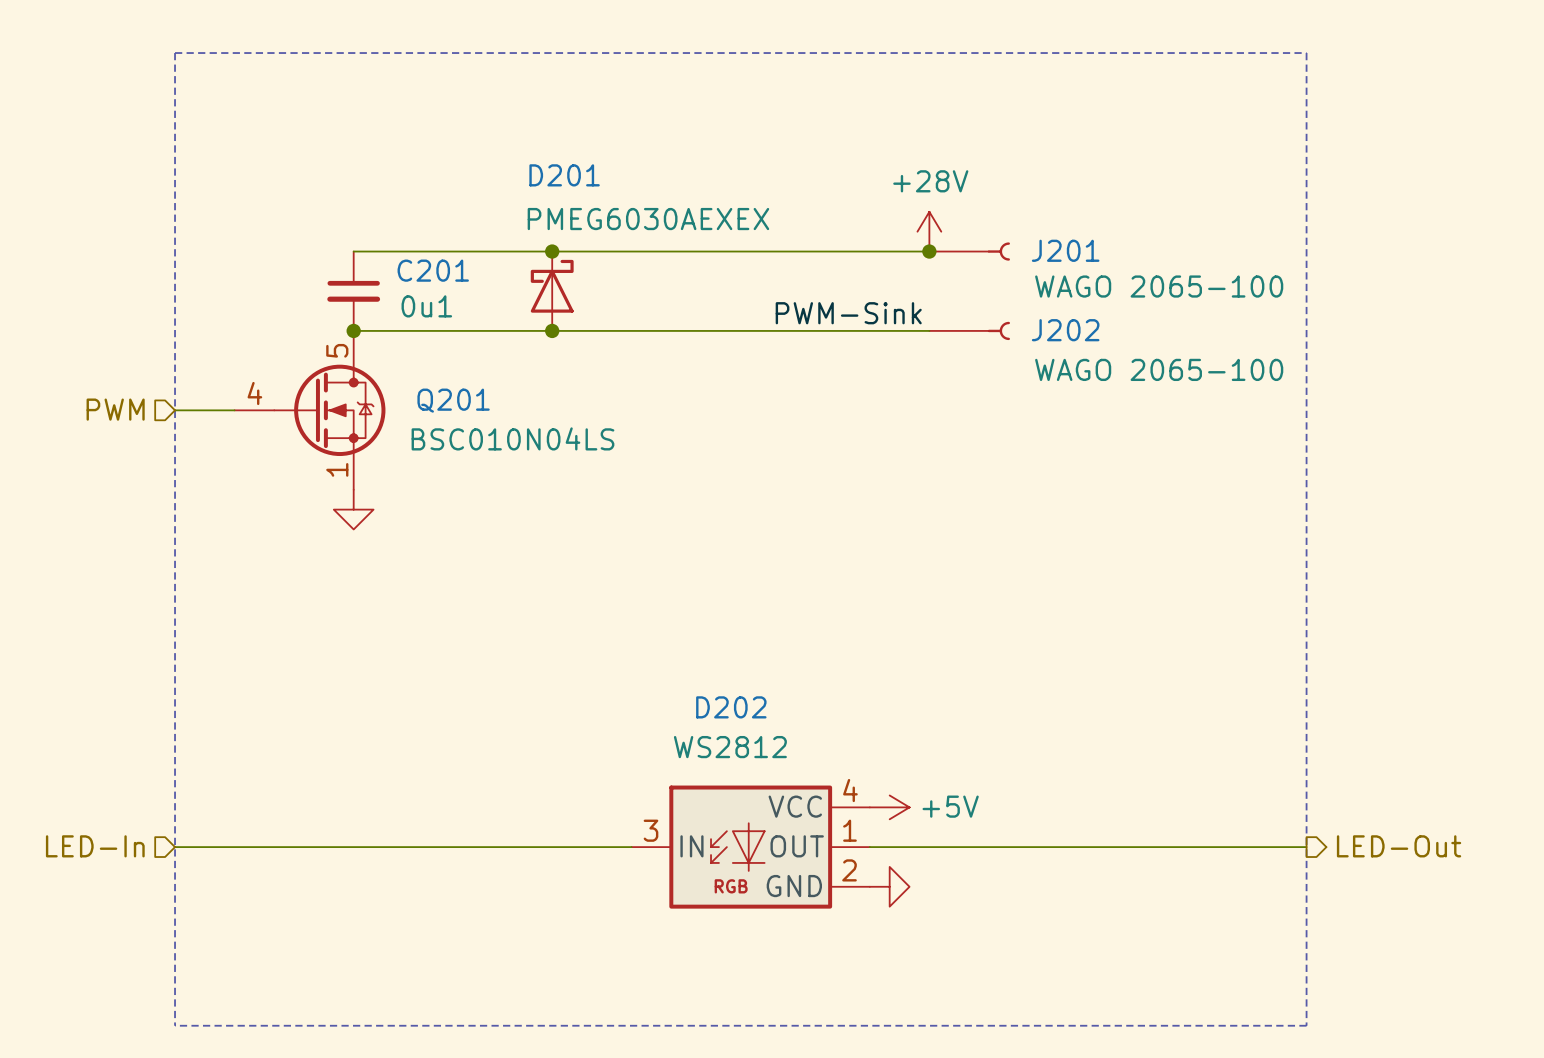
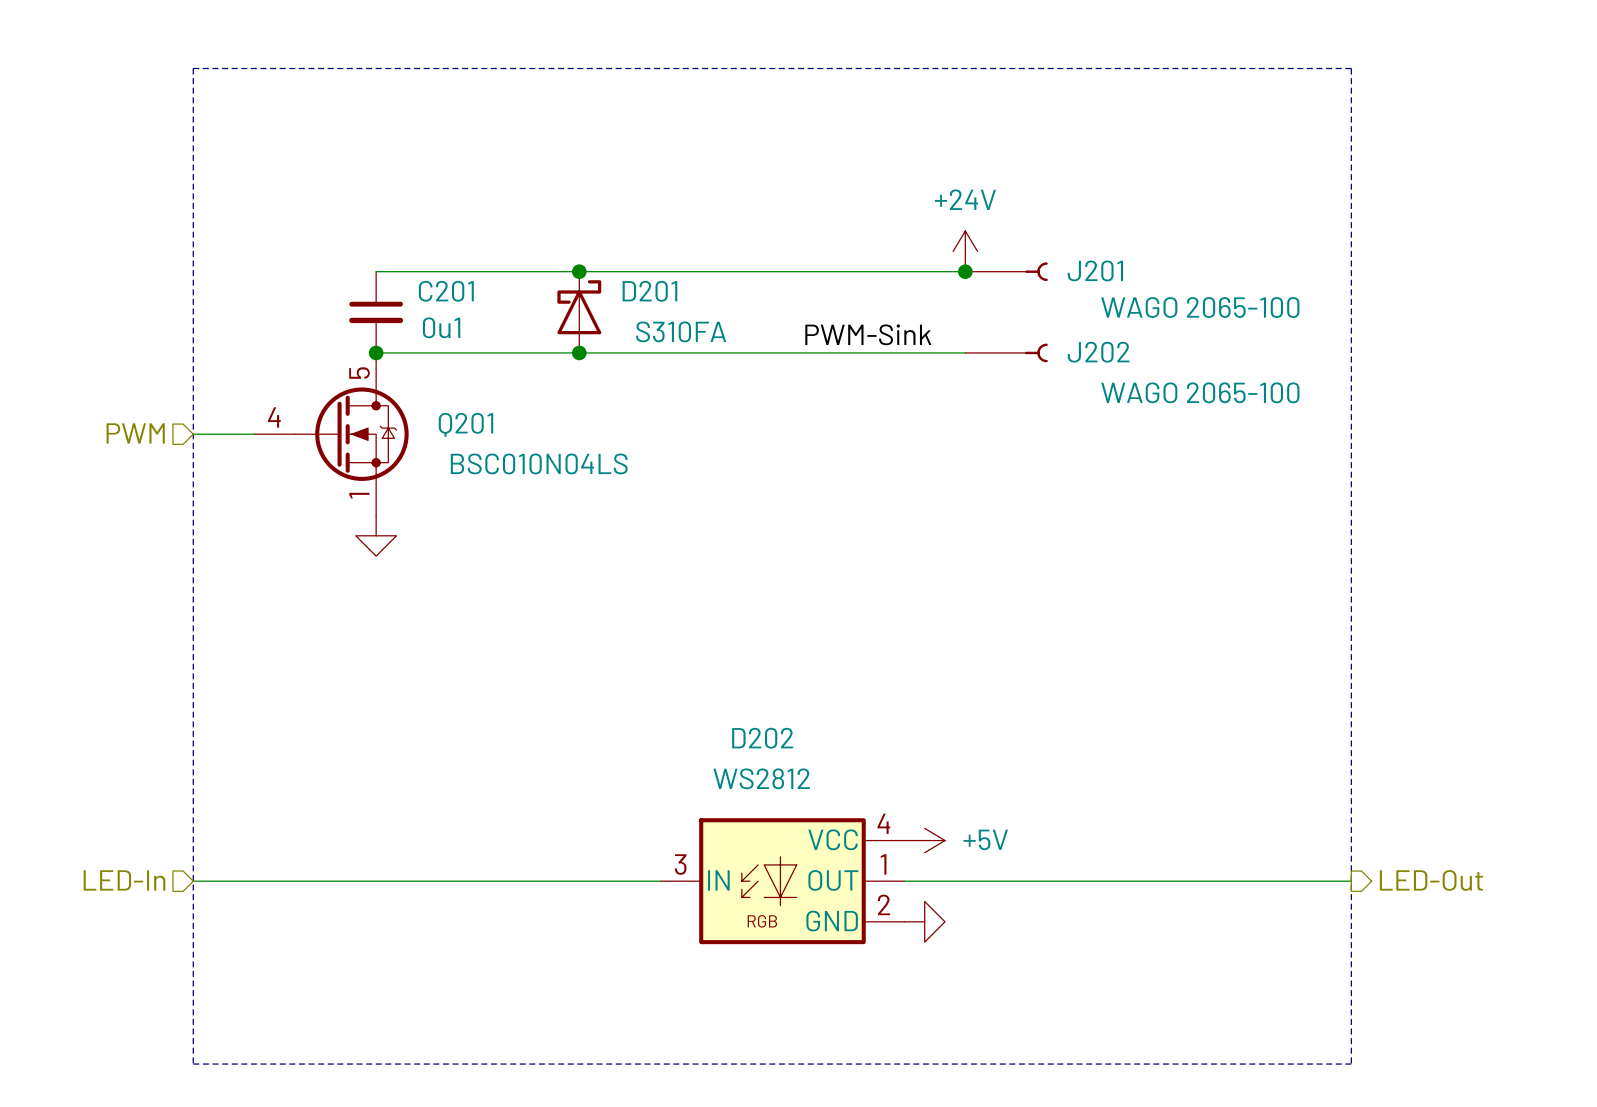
D201 name position: D201 (564, 175) -> D201 (649, 291)
D201 value: PMEG6030AEXEX (648, 219) -> S310FA (681, 331)
power symbol: +28V (929, 231) -> +24V (965, 251)

